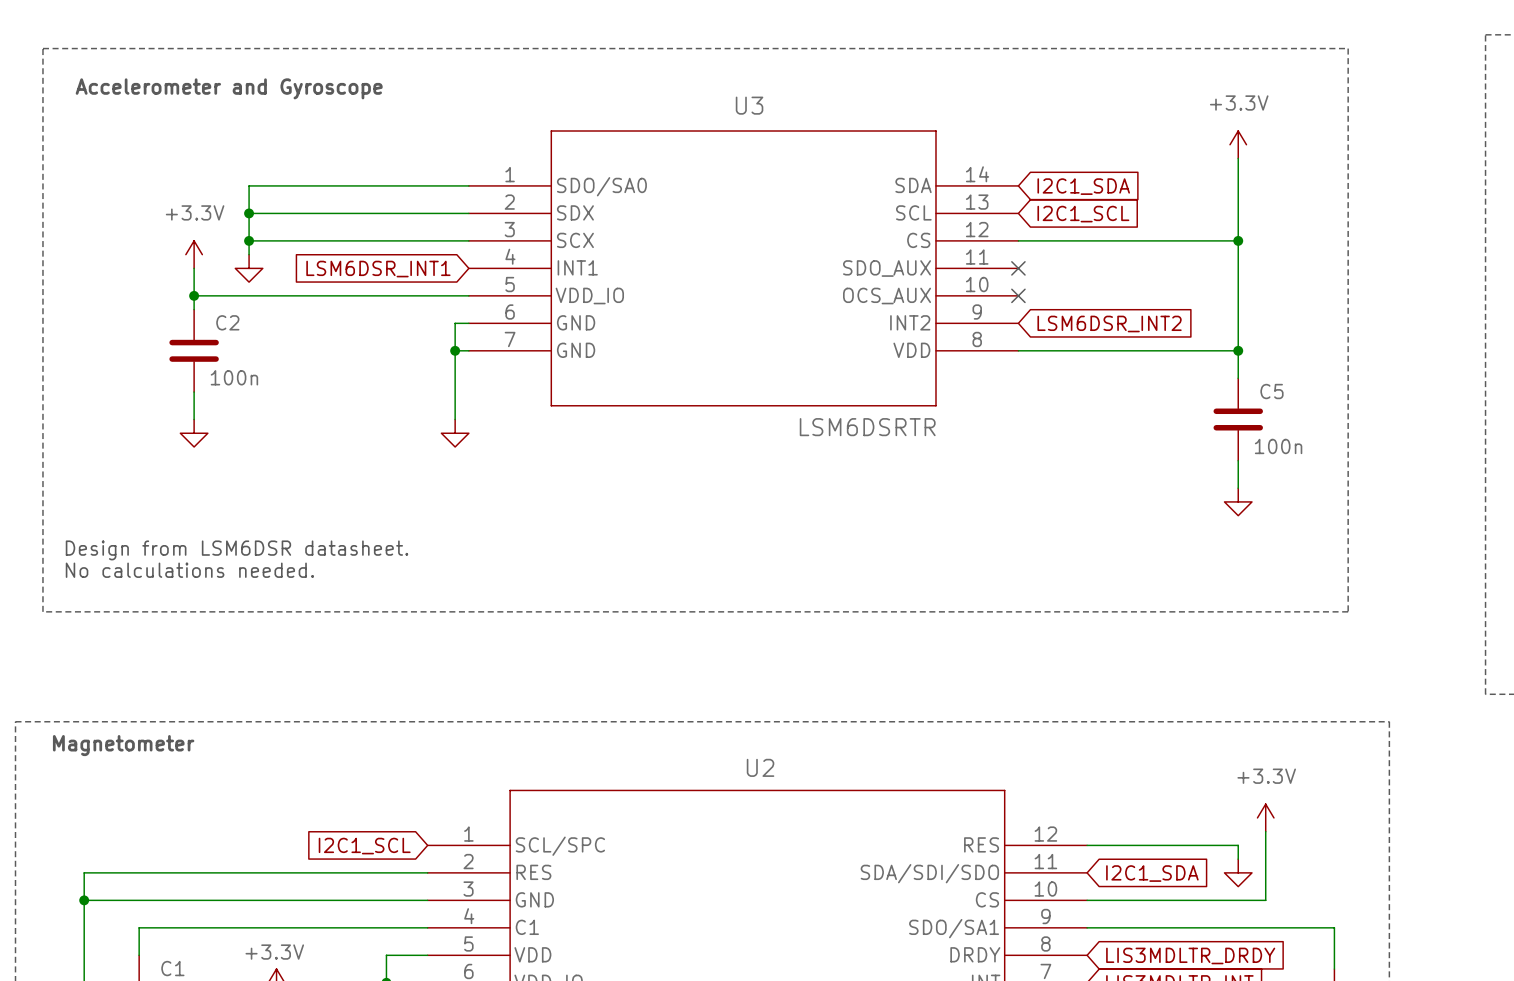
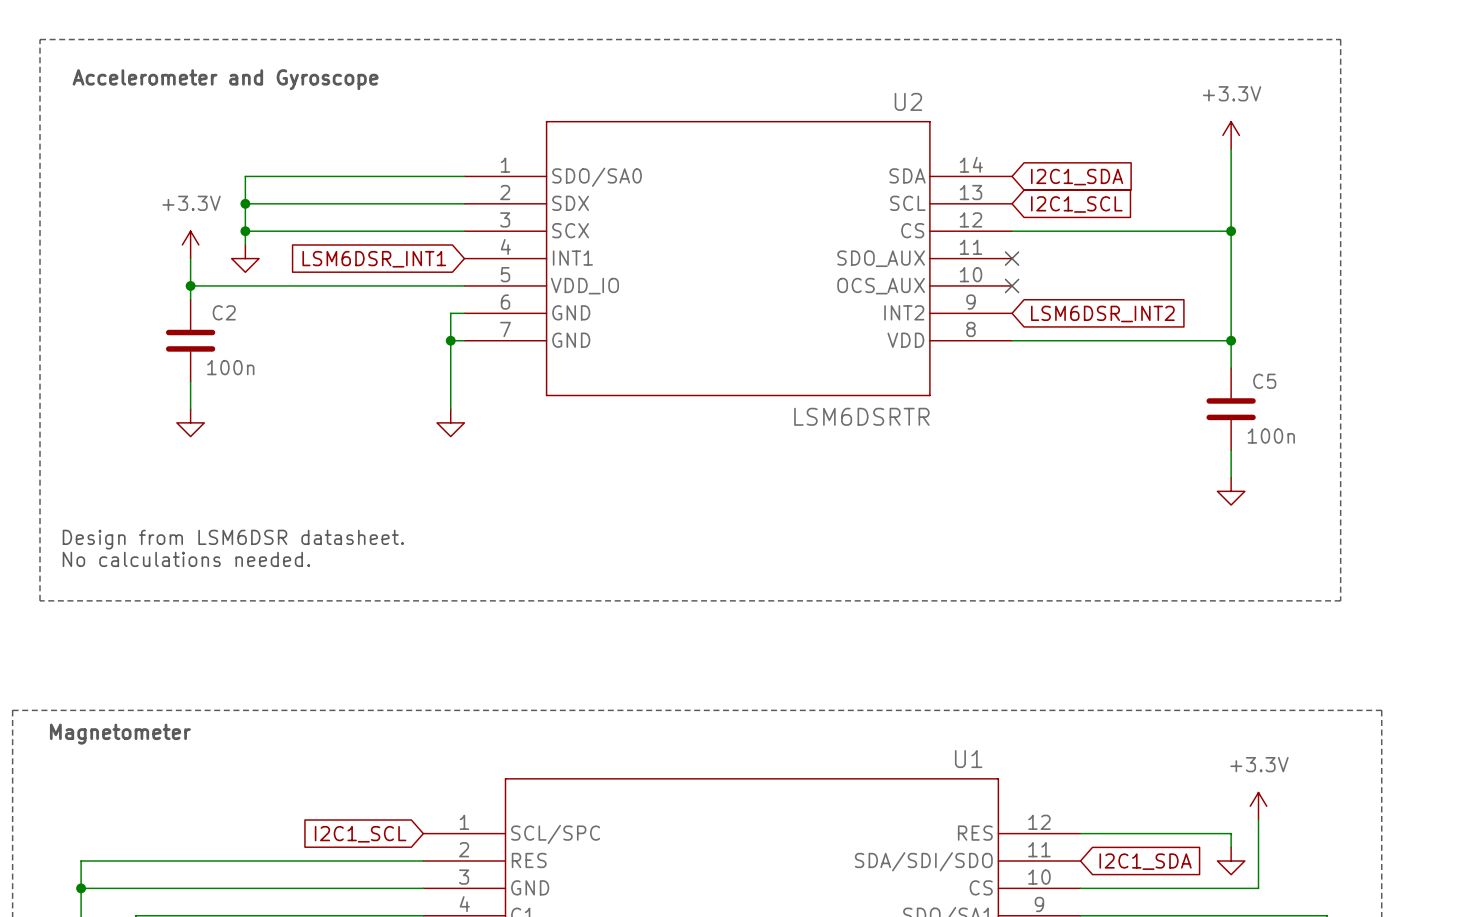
U3 name: U3 (749, 105) -> U2 (908, 101)
U2 name: U2 (760, 767) -> U1 (968, 759)

